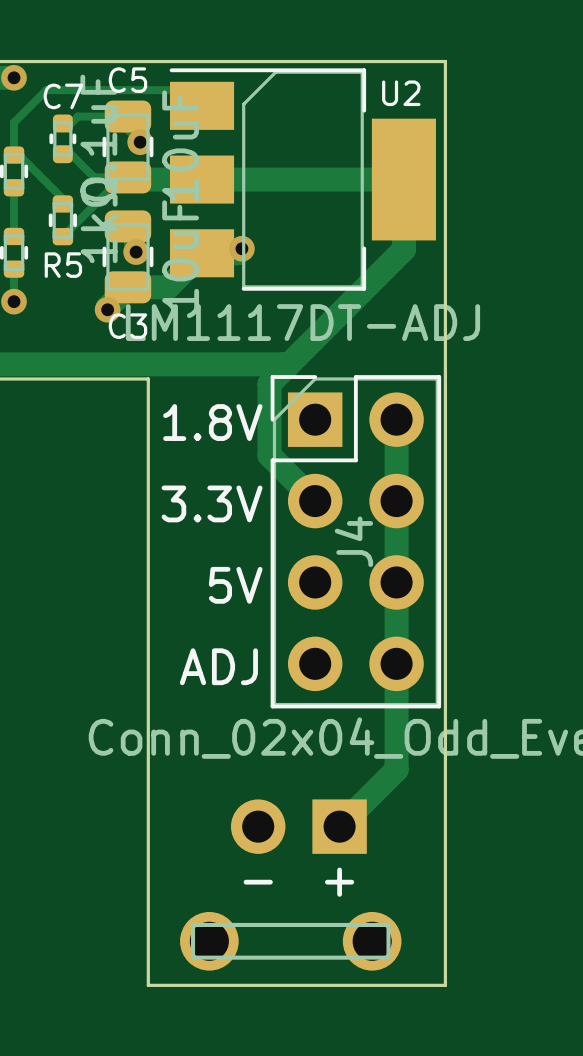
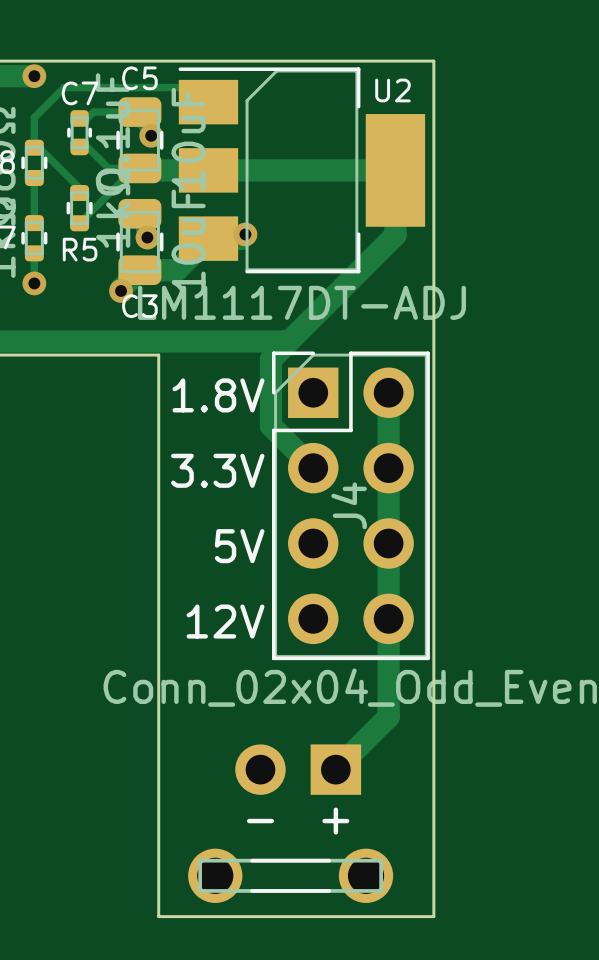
text: ADJ (218, 666) -> 12V (225, 621)
part footprint: [180, 911, 402, 971] -> [188, 848, 394, 903]

